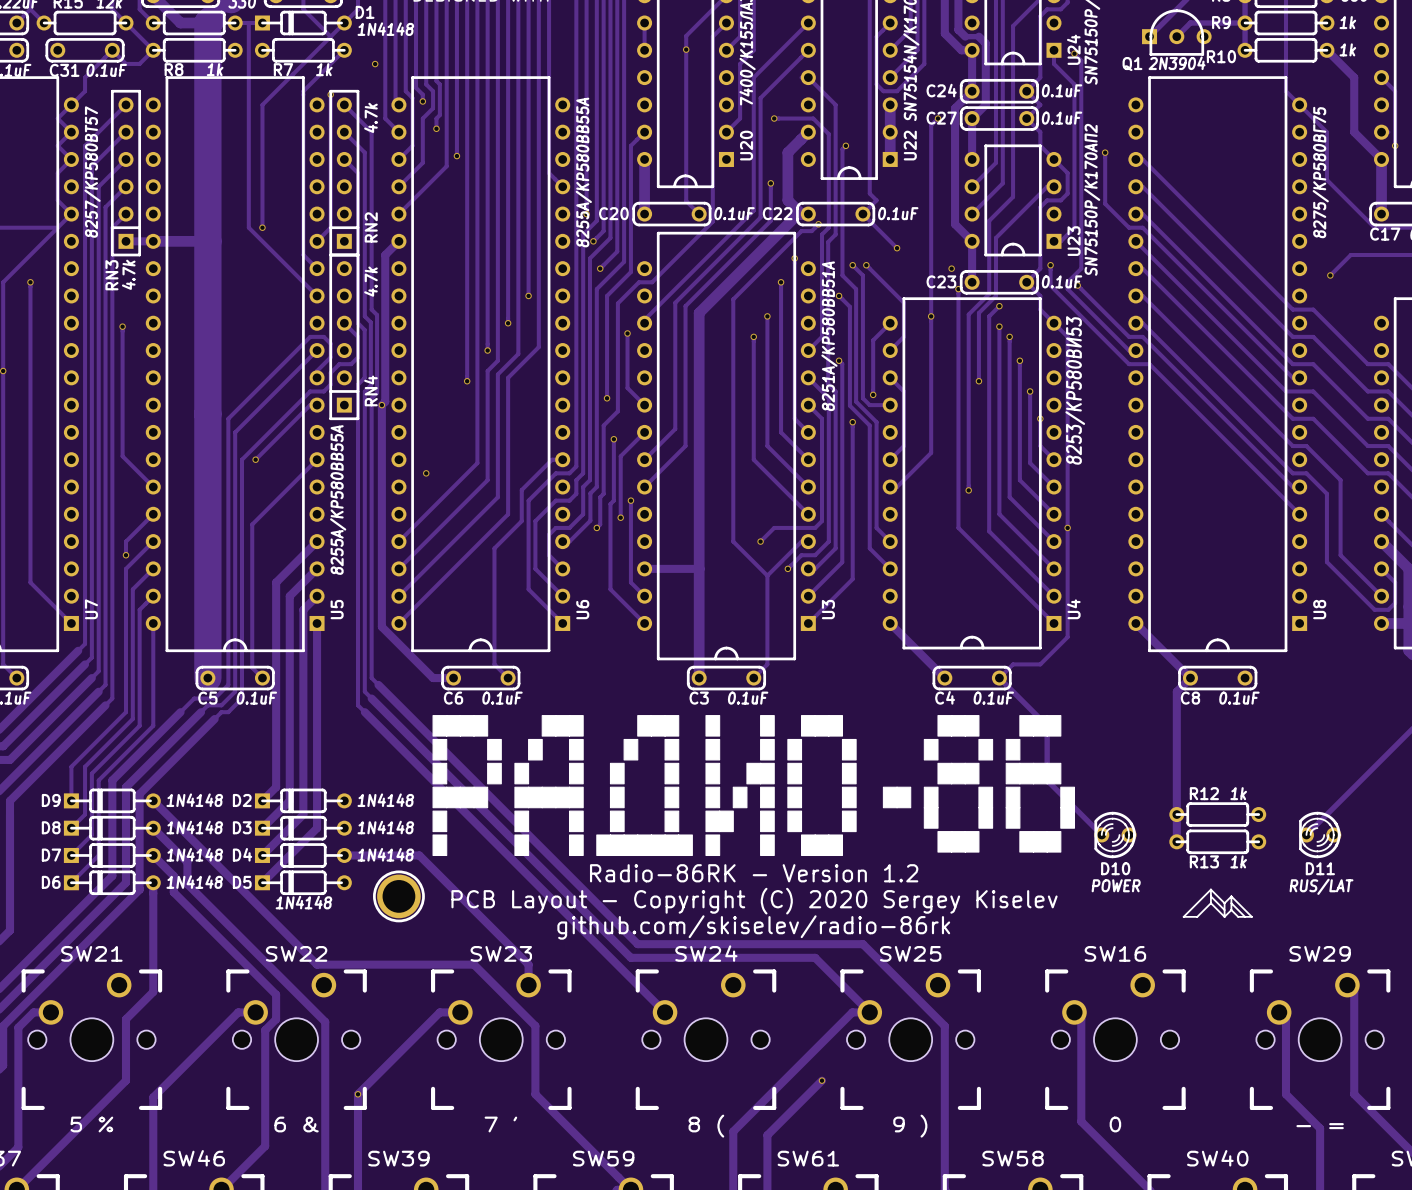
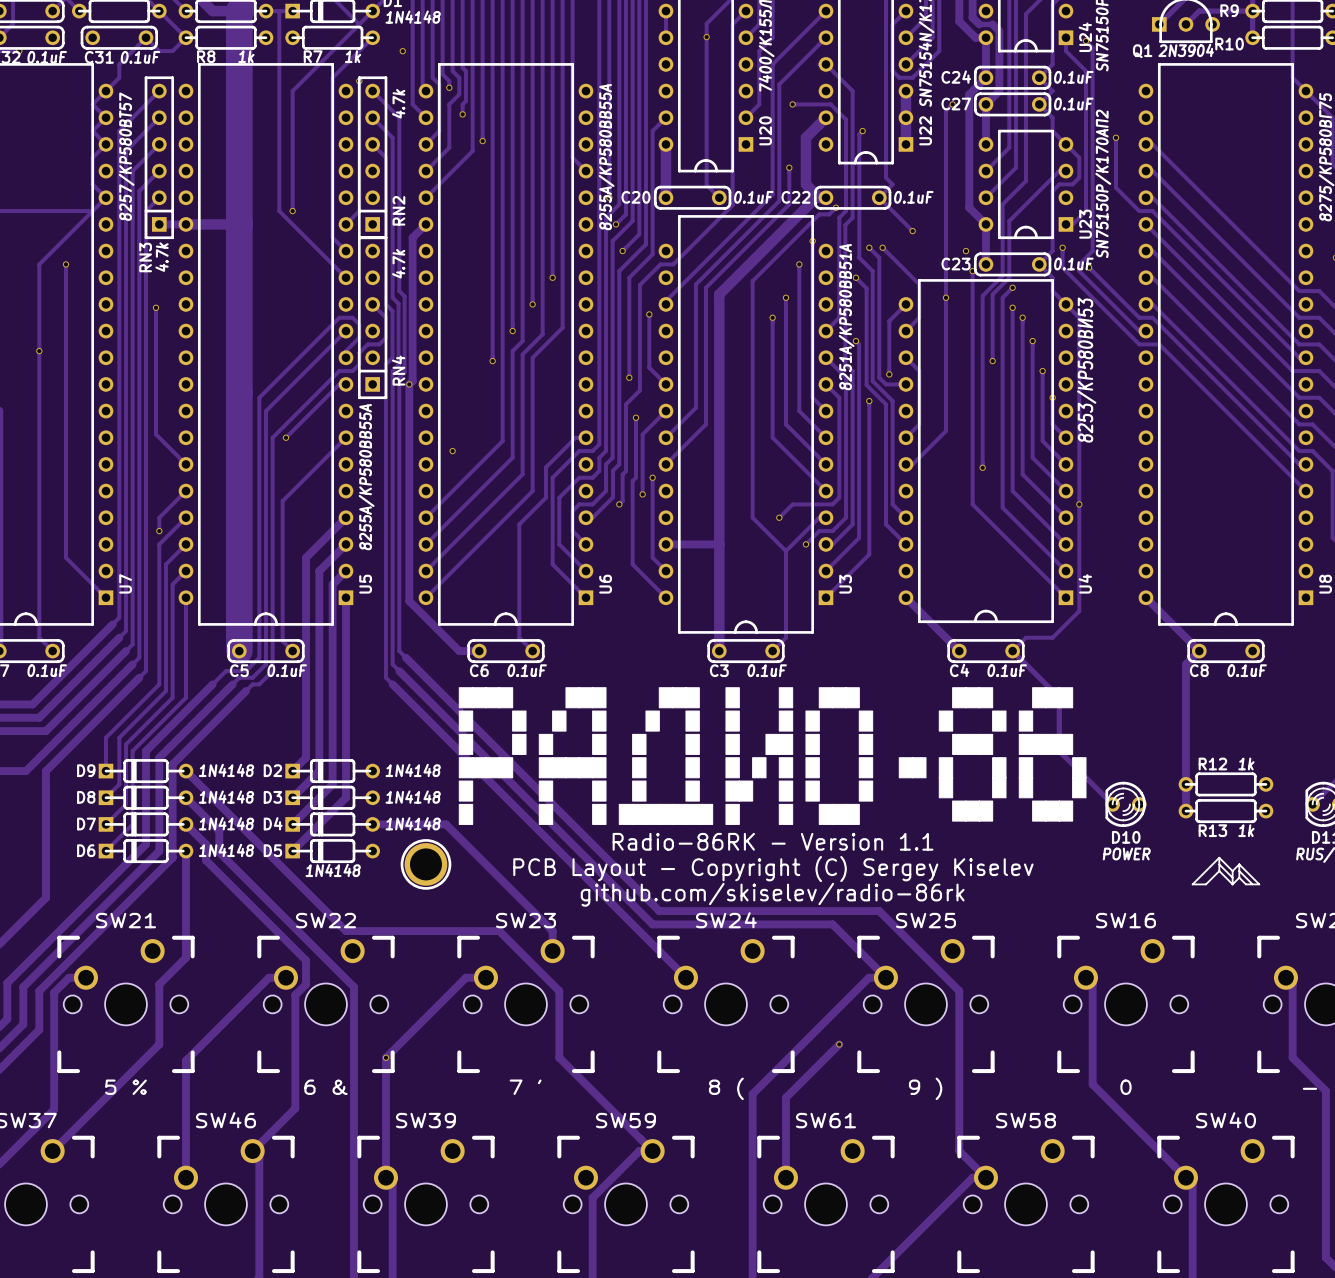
text: Radio-86RK - Version 1.2 (754, 873) -> Radio-86RK - Version 1.1 (773, 841)
text: PCB Layout - Copyright (C) 2020 Sergey Kiselev (754, 901) -> PCB Layout - Copyright (C) Sergey Kiselev (773, 869)

